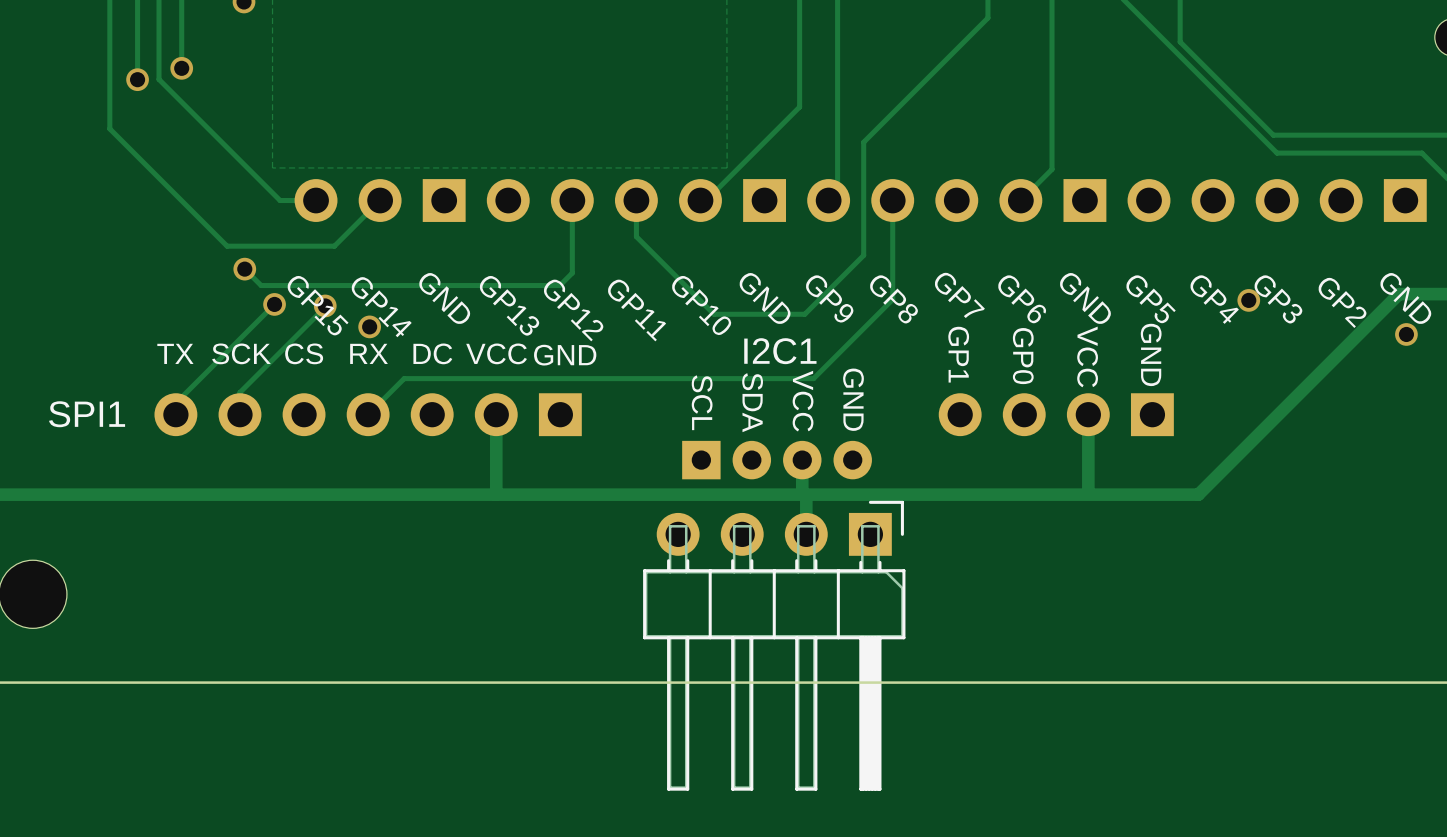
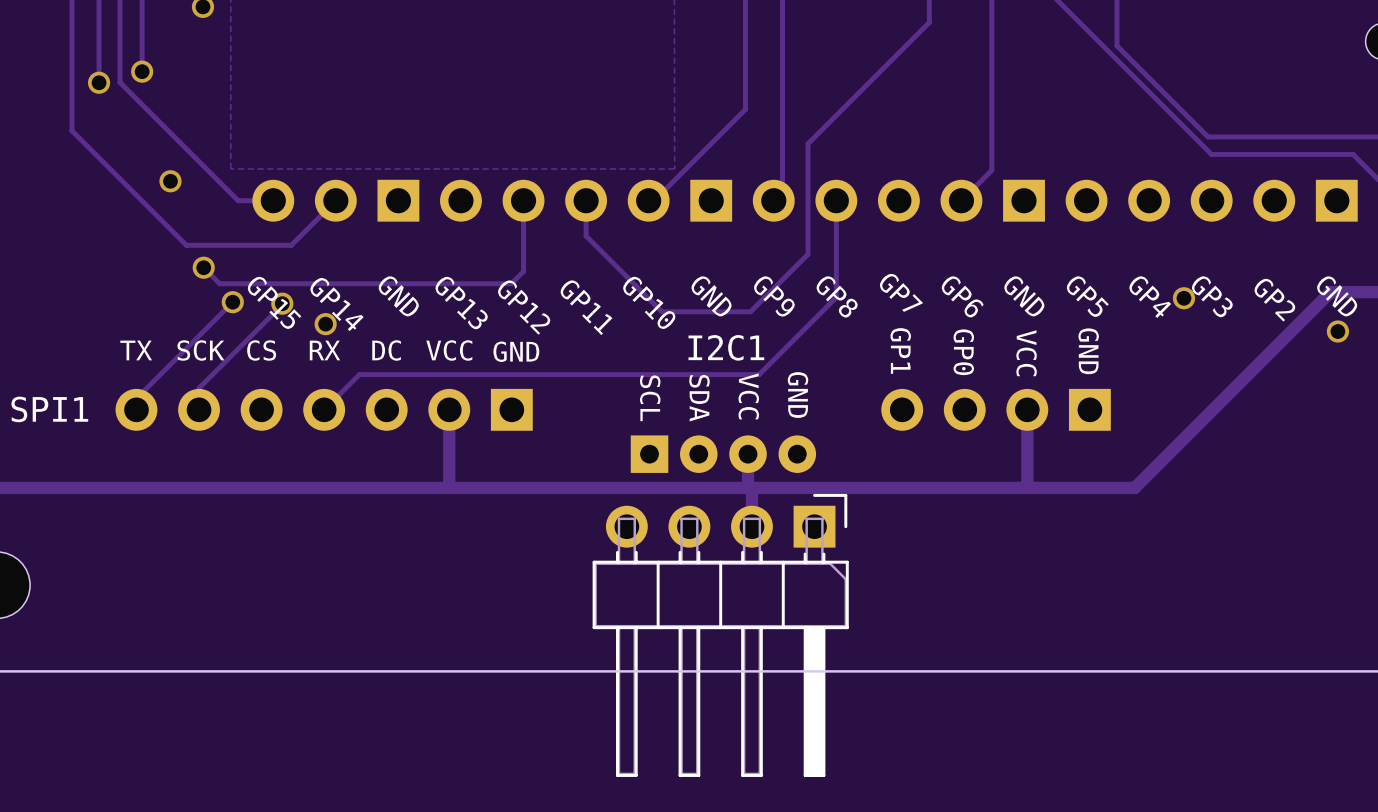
via: none -> (170, 181)

